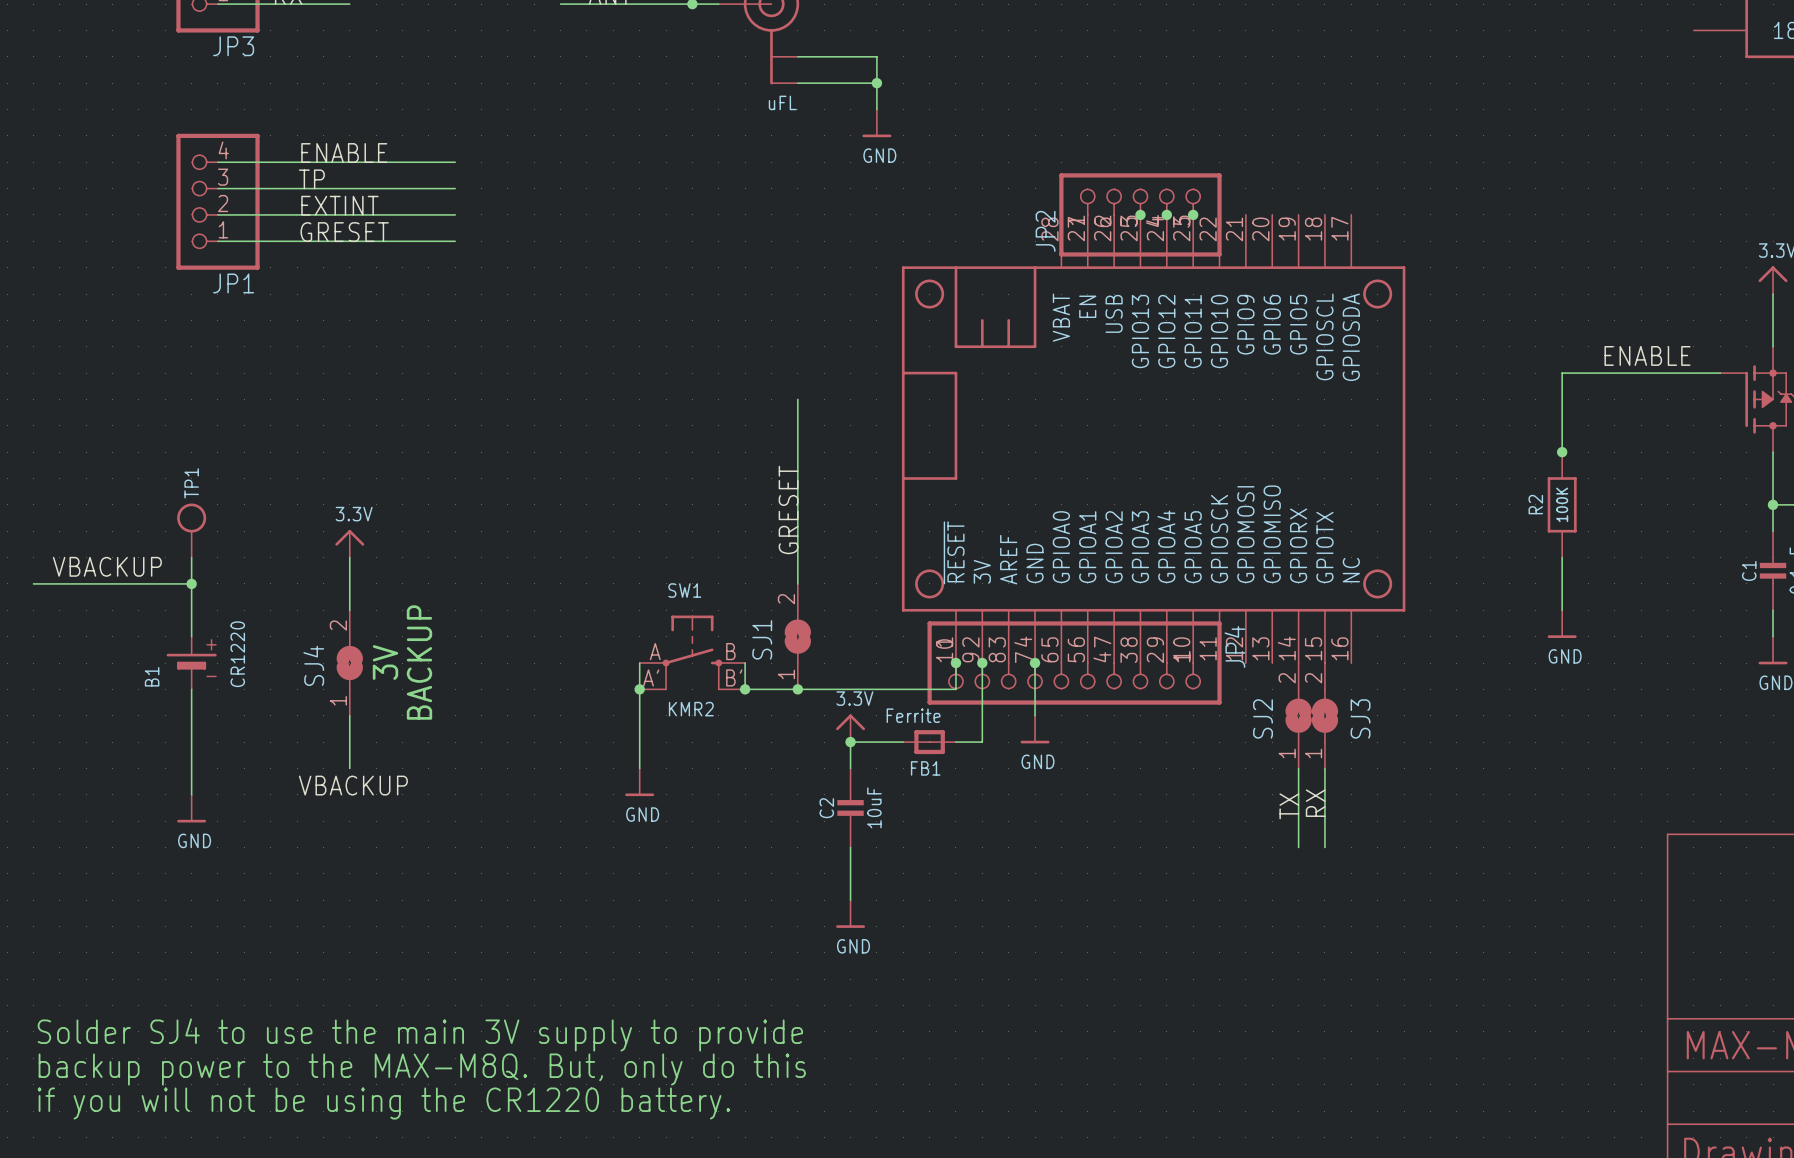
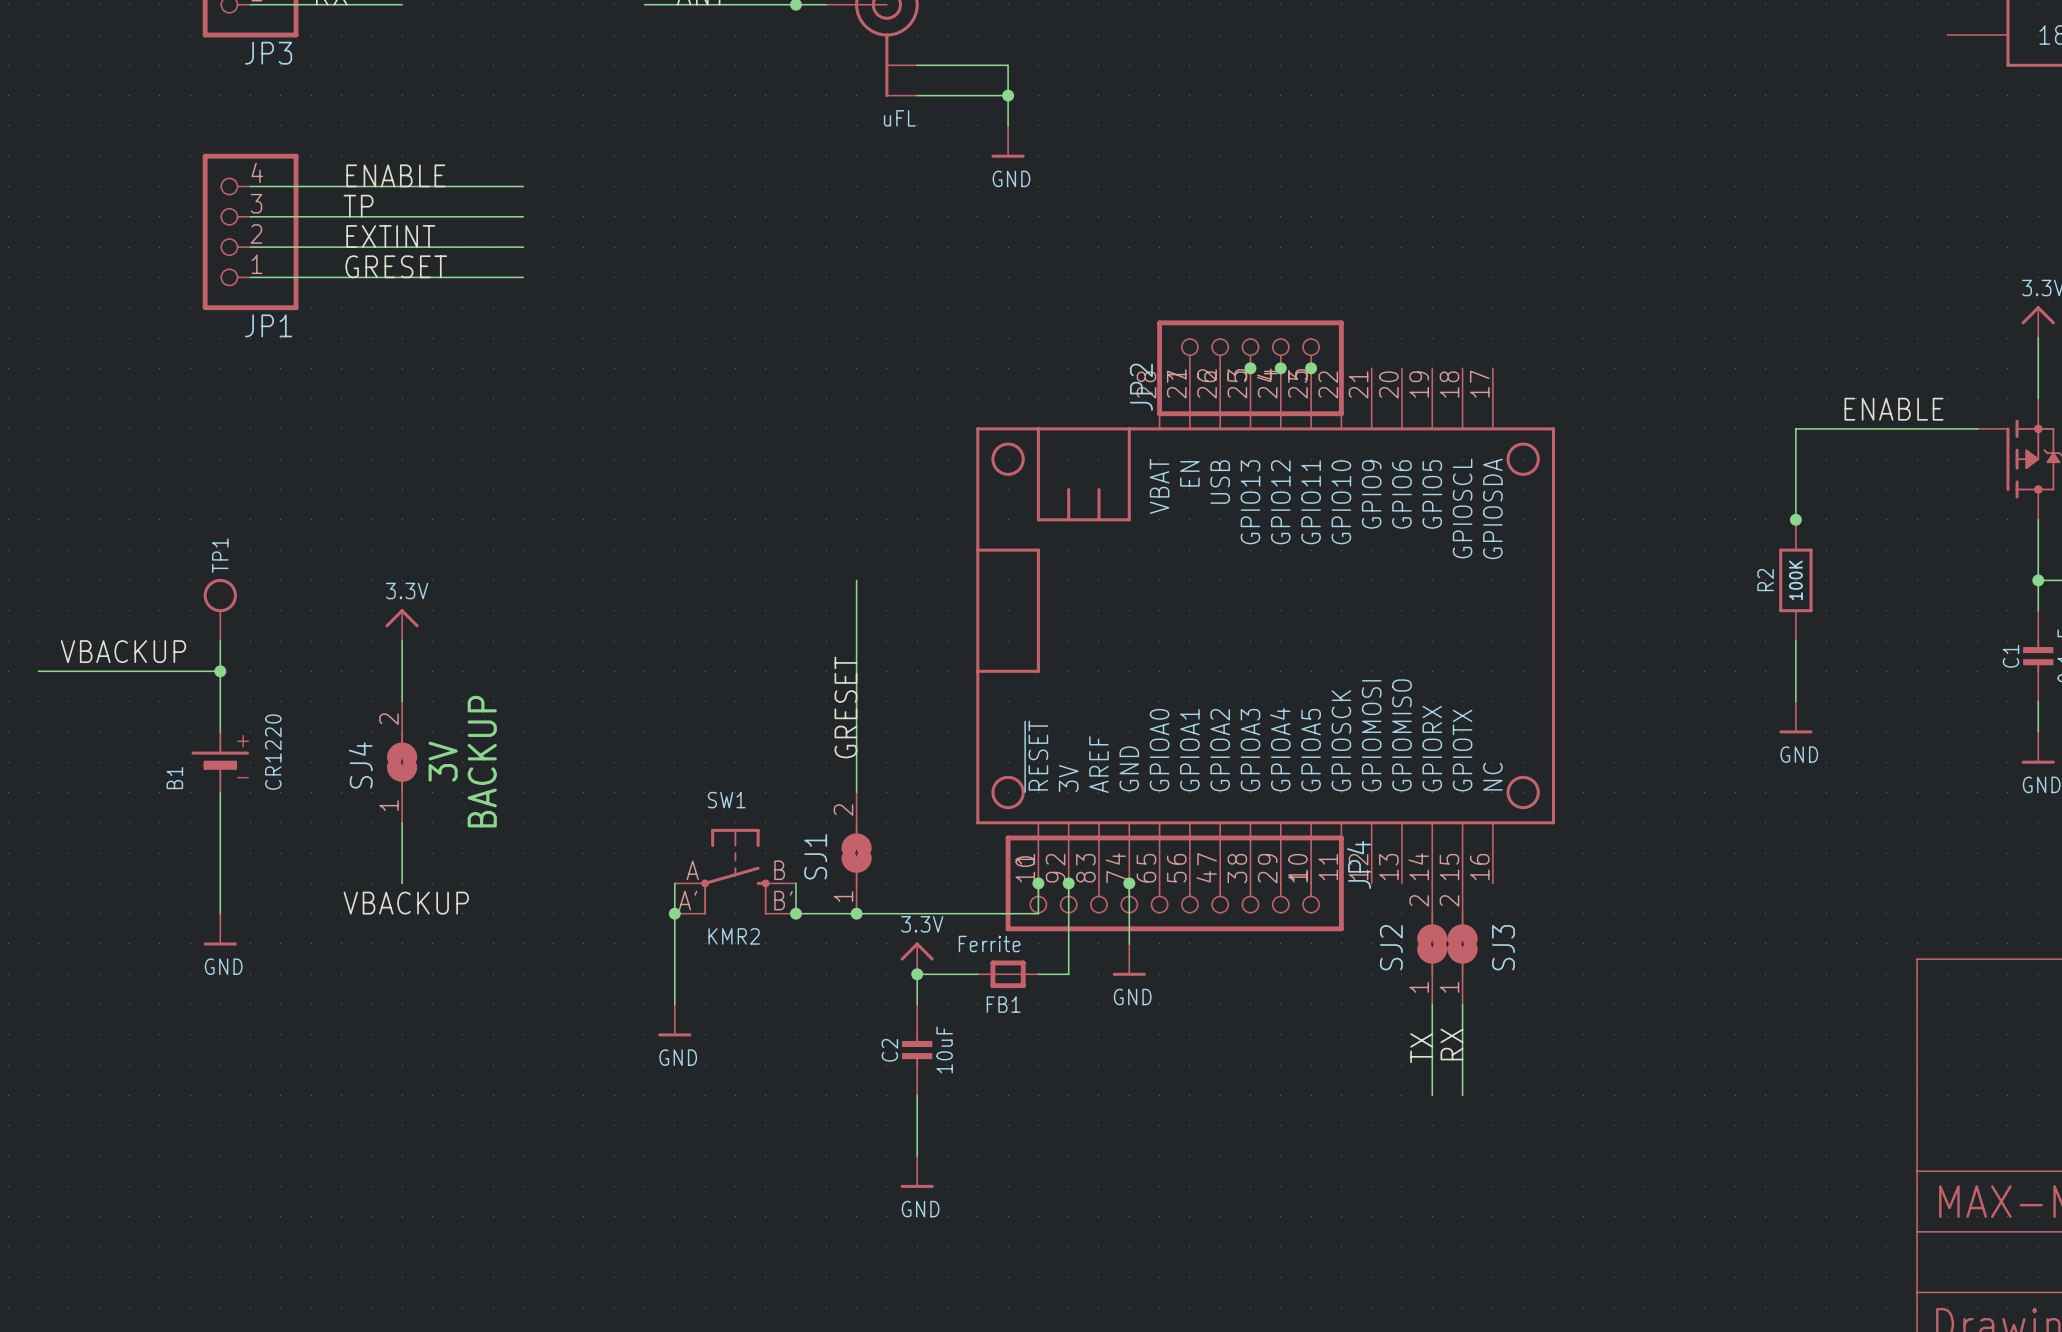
JP2 position: (1140, 214) -> (1250, 368)
junction: (1140, 214) -> none
junction: (1166, 214) -> none
junction: (1193, 214) -> none
junction: none -> (1250, 368)
junction: none -> (1280, 368)
junction: none -> (1311, 368)
wire: (797, 399) (797, 583) -> none
part position: (1153, 438) -> (1265, 625)
wire: none -> (856, 580) (856, 762)
label position: GRESET (788, 509) -> GRESET (845, 707)
SJ1 position: (797, 636) -> (856, 853)
SW1 position: (692, 652) -> (735, 871)
wire: (639, 663) (639, 768) -> (674, 883) (674, 1004)
wire: (955, 663) (955, 689) (745, 689) -> none
junction: (955, 663) -> none
wire: (982, 663) (982, 742) (955, 742) -> (1068, 883) (1068, 974) (1038, 974)
junction: (982, 663) -> none
wire: (1035, 663) (1035, 715) -> (1129, 883) (1129, 943)
junction: (1035, 663) -> none
JP4 position: (1074, 663) -> (1174, 883)
junction: (639, 689) -> none
junction: (745, 689) -> none
junction: (797, 689) -> none
SJ2 position: (1298, 715) -> (1432, 943)
SJ3 position: (1324, 715) -> (1462, 943)
power symbol position: 3.3V (850, 728) -> 3.3V (917, 958)
power symbol: GND (1035, 729) -> none
junction: (850, 742) -> none
wire: (903, 742) (850, 742) (850, 768) -> none
FB1 position: (929, 742) -> (1008, 974)
wire: none -> (795, 883) (795, 913) (1038, 913) (1038, 883)
junction: none -> (1038, 883)
junction: none -> (1068, 883)
junction: none -> (1129, 883)
wire: (1298, 768) (1298, 847) -> (1432, 1004) (1432, 1095)
wire: (1324, 768) (1324, 847) -> (1462, 1004) (1462, 1095)
power symbol position: GND (639, 782) -> GND (674, 1020)
junction: none -> (674, 913)
junction: none -> (795, 913)
junction: none -> (856, 913)
label position: RX (1315, 803) -> RX (1451, 1044)
label position: TX (1289, 806) -> TX (1421, 1048)
C2 position: (850, 807) -> (917, 1050)
power symbol: none -> GND (1129, 959)
junction: none -> (917, 974)
wire: (850, 847) (850, 900) -> (977, 974) (917, 974) (917, 1004)
power symbol: GND (850, 914) -> none
wire: none -> (917, 1095) (917, 1156)
power symbol: none -> GND (917, 1172)
text: Solder SJ4 to use the main 3V supply to provide (420, 1034) -> none
text: backup power to the MAX-M8Q. But, only do this (422, 1069) -> none
text: if you will not be using the CR1220 battery. (383, 1103) -> none

